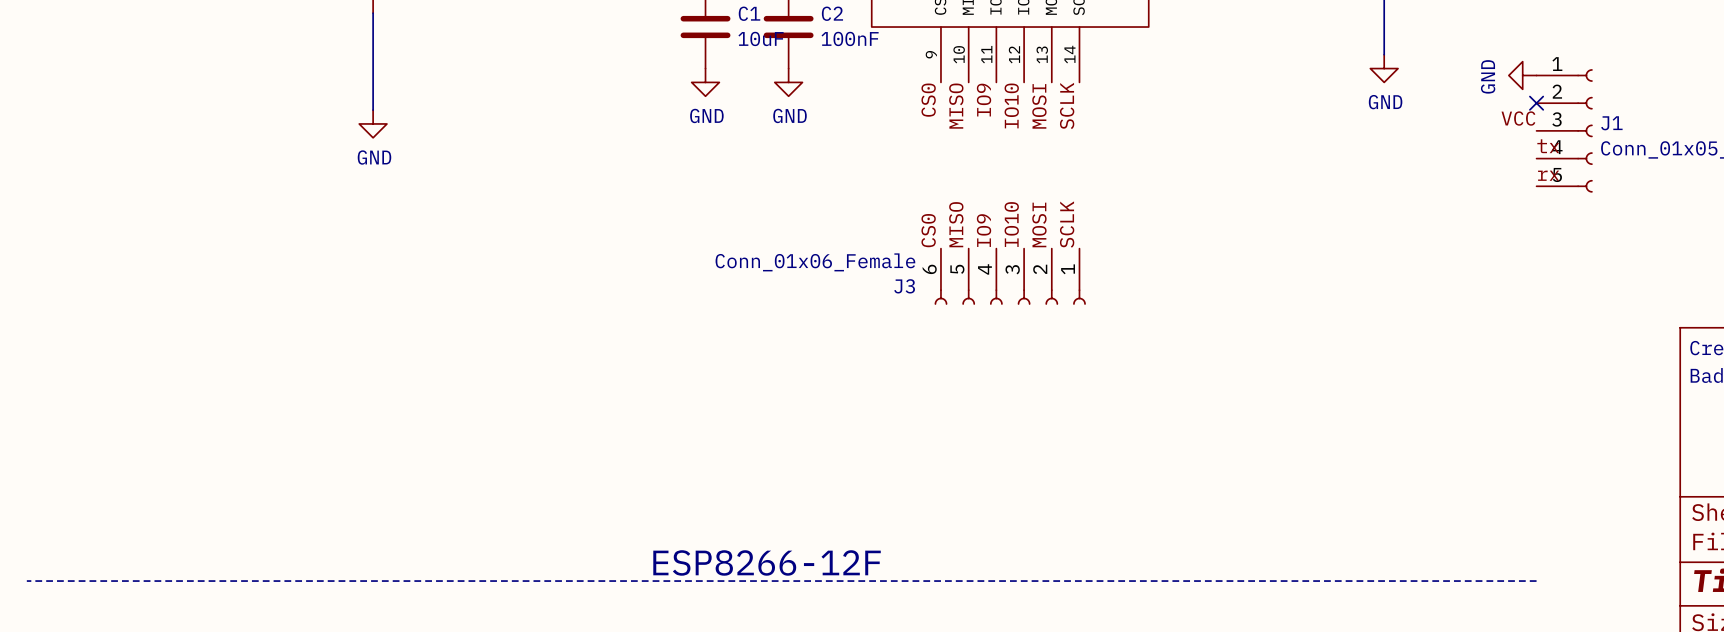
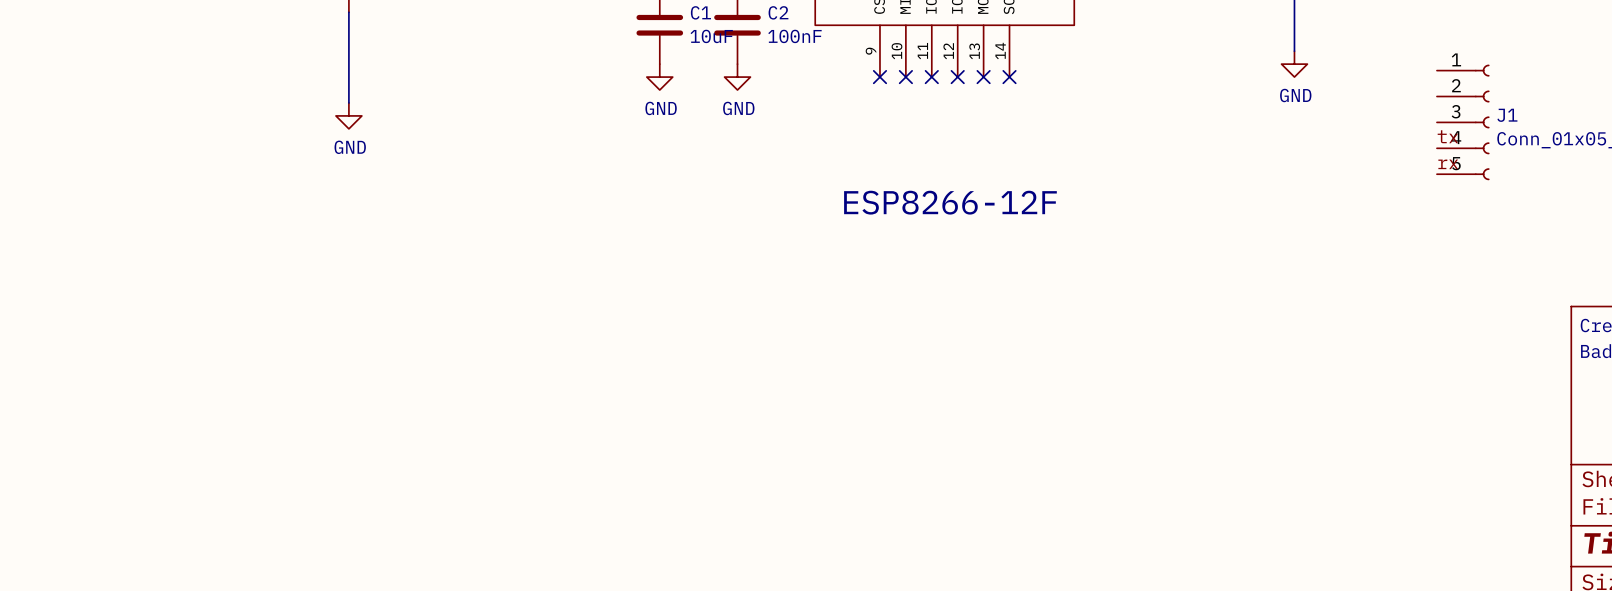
power symbol: GND (1522, 75) -> none
no-connect mark: none -> (879, 77)
no-connect mark: none -> (905, 77)
no-connect mark: none -> (931, 77)
no-connect mark: none -> (957, 77)
no-connect mark: none -> (983, 77)
no-connect mark: none -> (1009, 77)
label: CS0 (928, 100) -> none
label: IO9 (984, 100) -> none
no-connect mark: (1536, 103) -> none
label: IO10 (1011, 105) -> none
label: MISO (956, 106) -> none
label: MOSI (1039, 106) -> none
label: SCLK (1067, 106) -> none
label: VCC (1518, 118) -> none
text: none -> ESP8266-12F (950, 202)
label: MISO (956, 224) -> none
label: IO10 (1011, 224) -> none
label: MOSI (1039, 224) -> none
label: SCLK (1067, 224) -> none
label: CS0 (928, 230) -> none
label: IO9 (984, 230) -> none
J3: Conn_01x06_Female (1010, 276) -> none
text: ESP8266-12F (767, 562) -> none
line: (26, 581) (1536, 581) -> none

